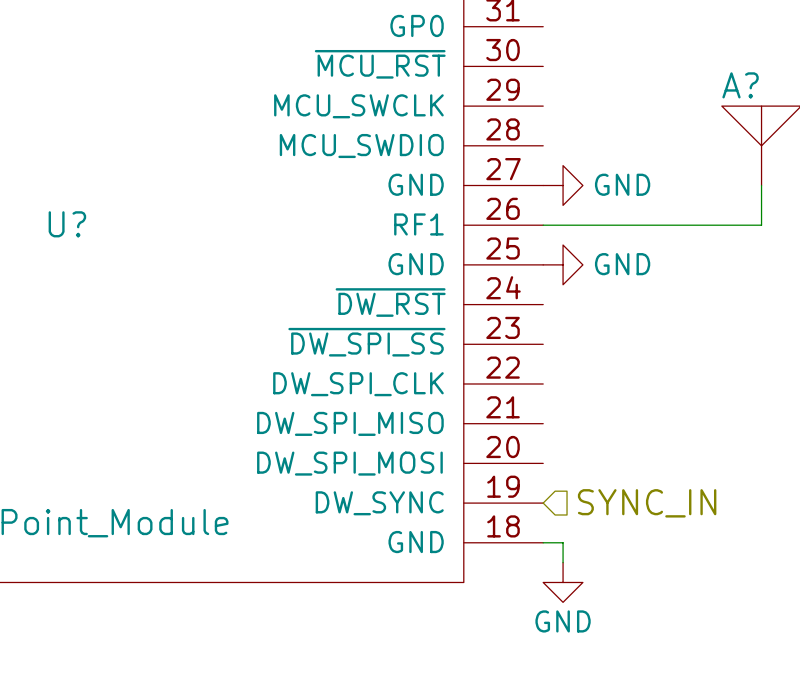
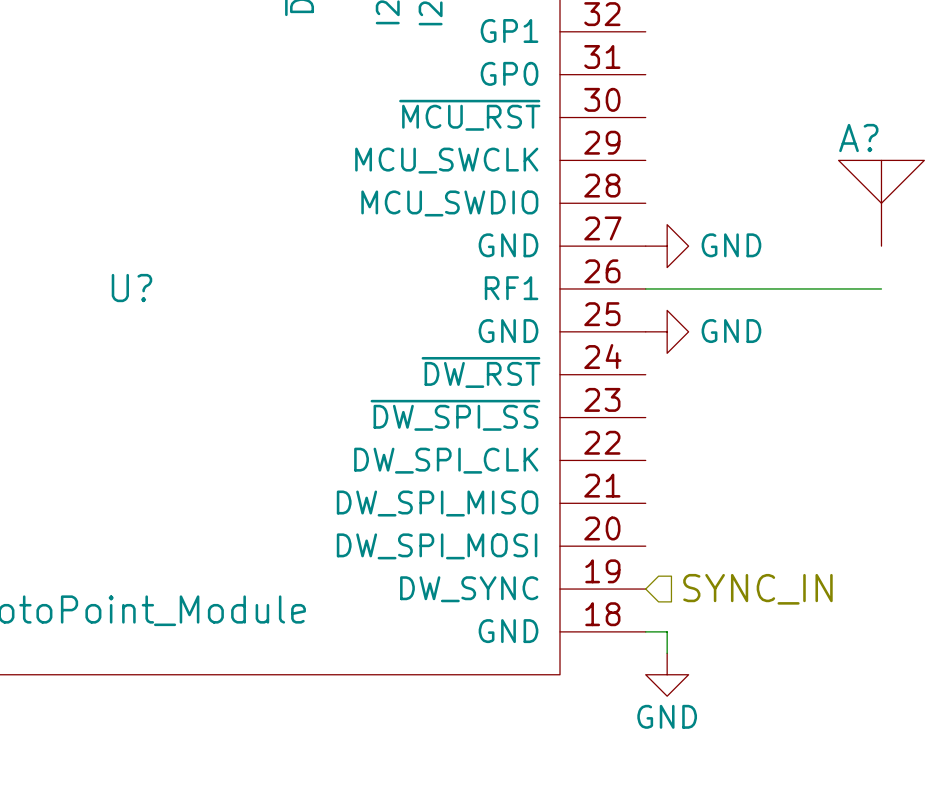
wire: (761, 185) (761, 225) -> none

